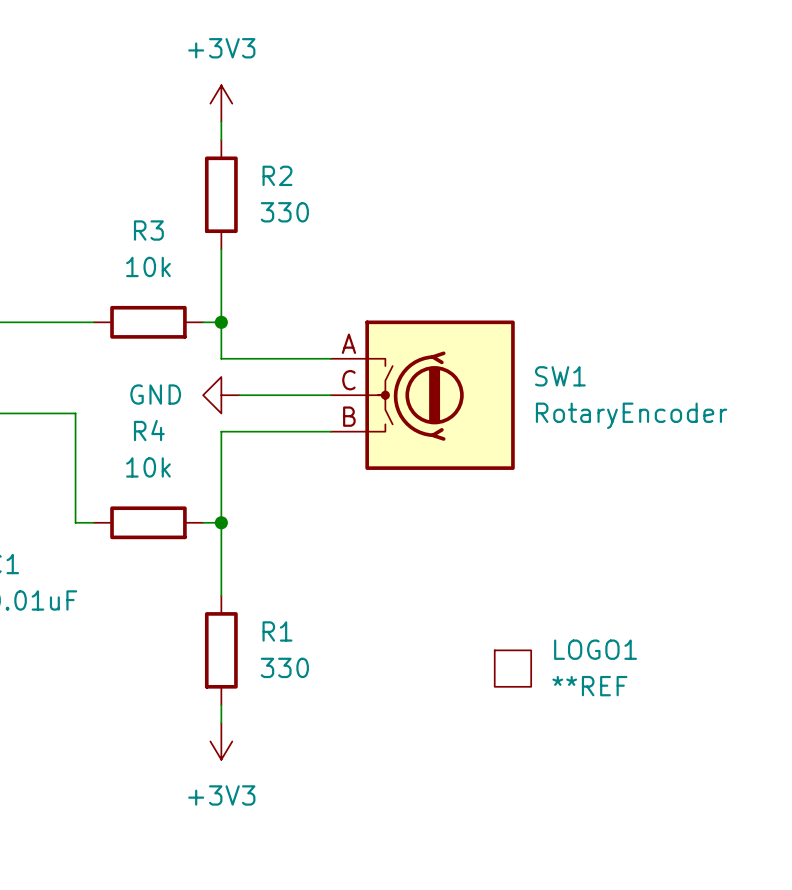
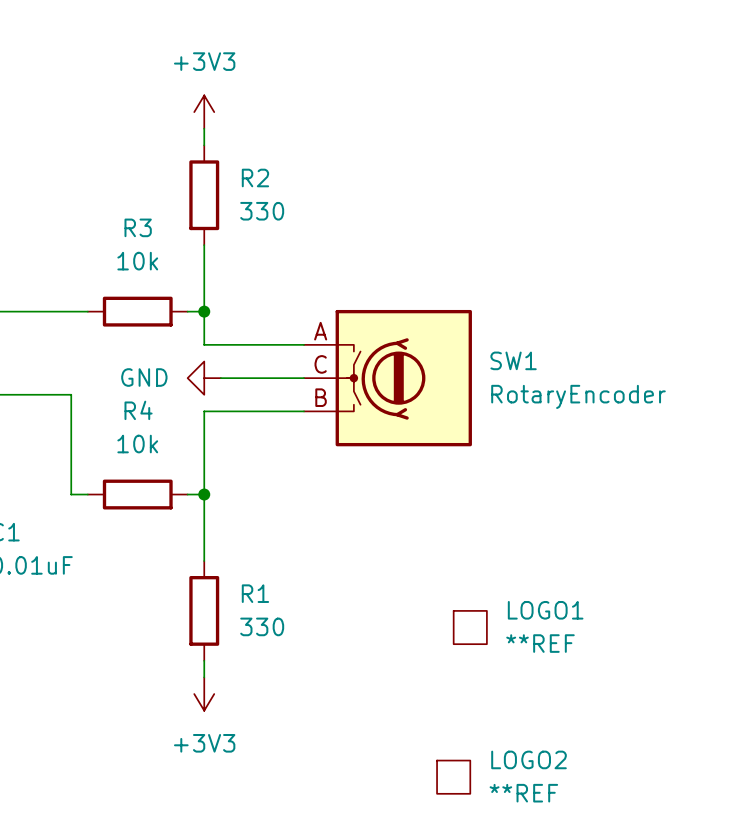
LOGO2: none -> **REF (453, 777)

